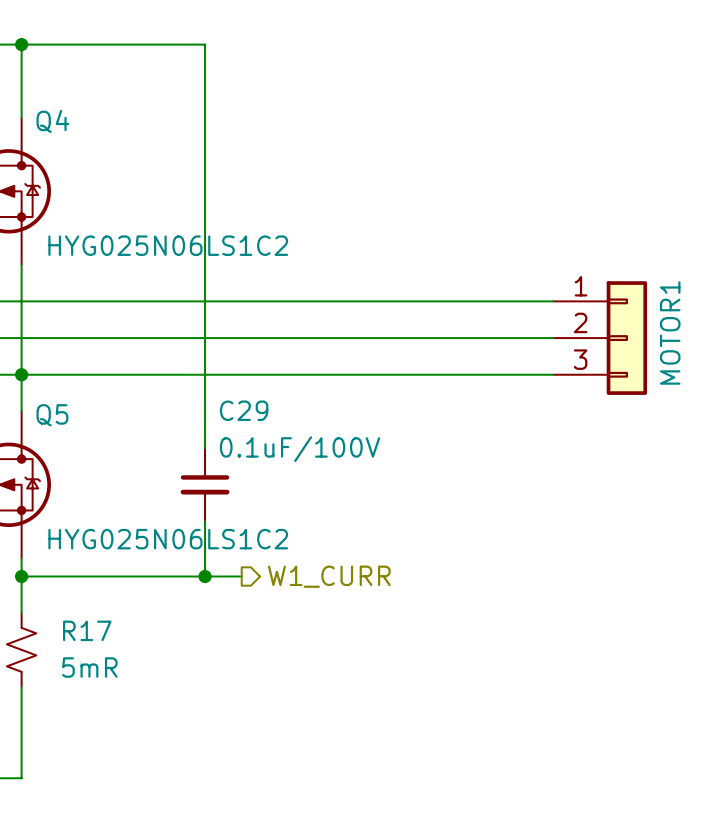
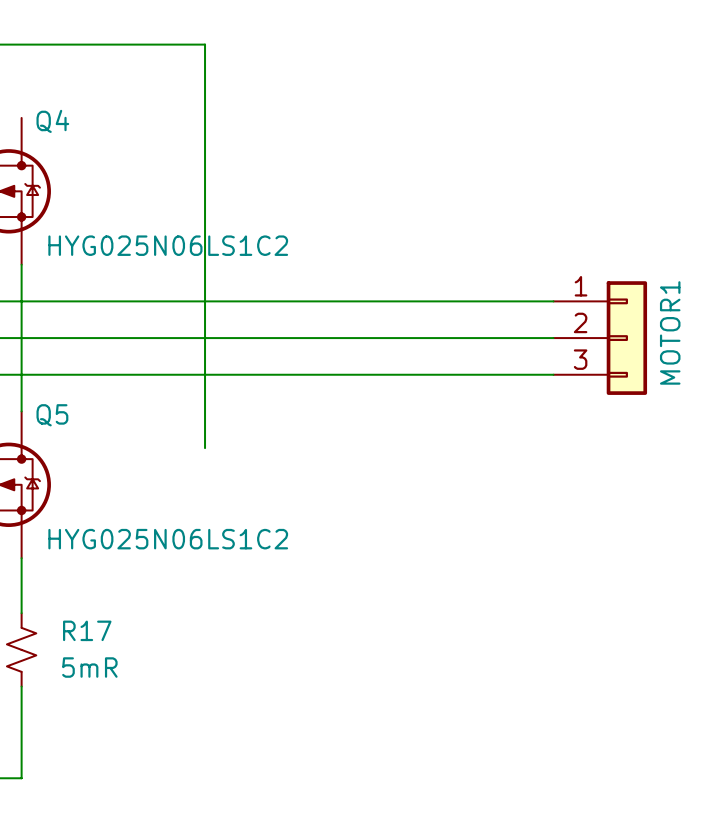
wire: (21, 44) (21, 117) -> none
junction: (21, 44) -> none
junction: (21, 374) -> none
C29: 0.1uF/100V (205, 484) -> none
wire: (205, 521) (205, 576) -> none
wire: (21, 576) (241, 576) -> none
junction: (21, 576) -> none
junction: (205, 576) -> none
hierarchical label: W1_CURR (329, 576) -> none

